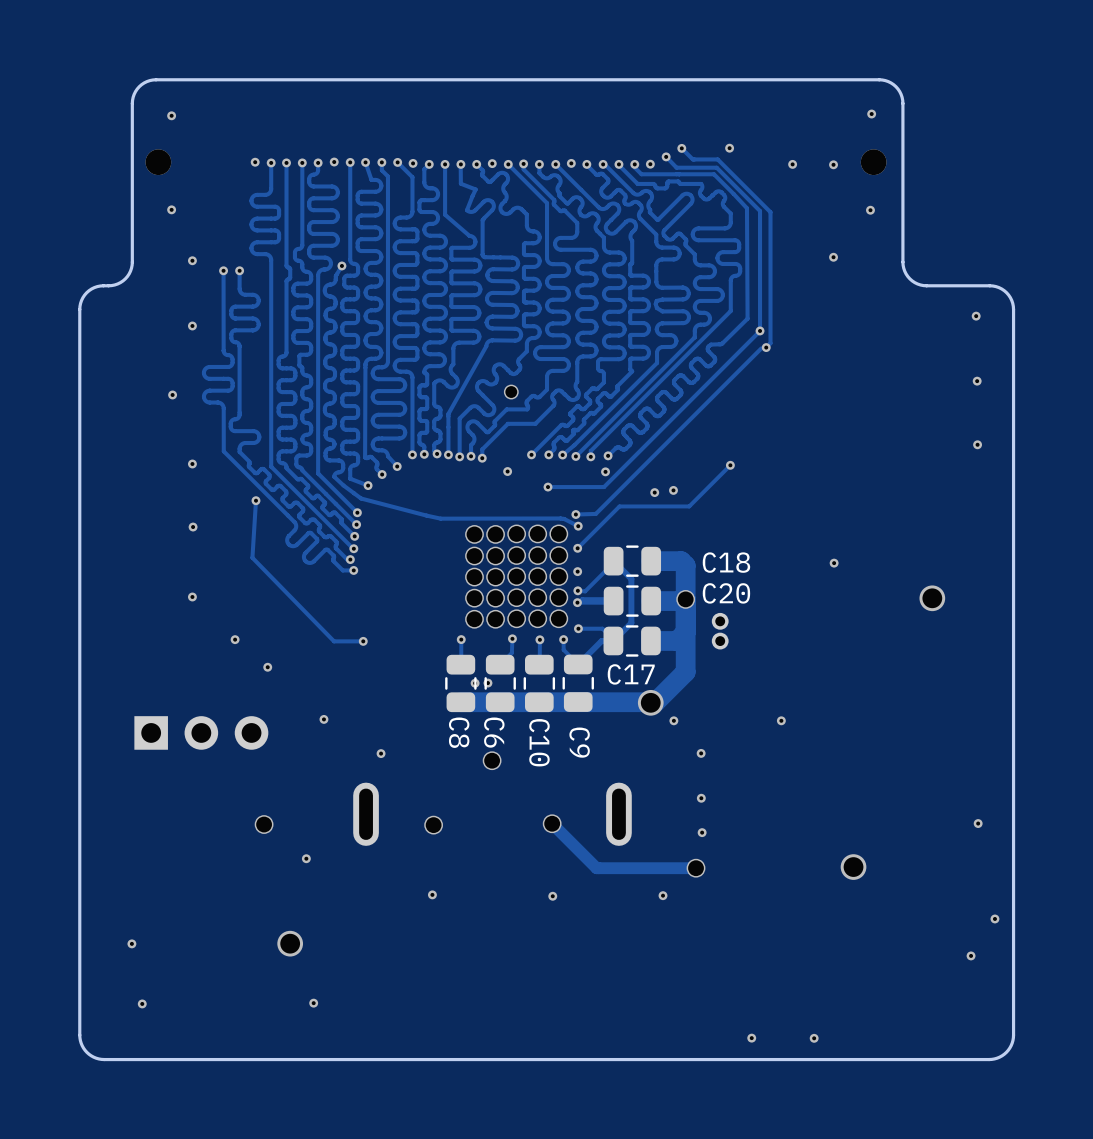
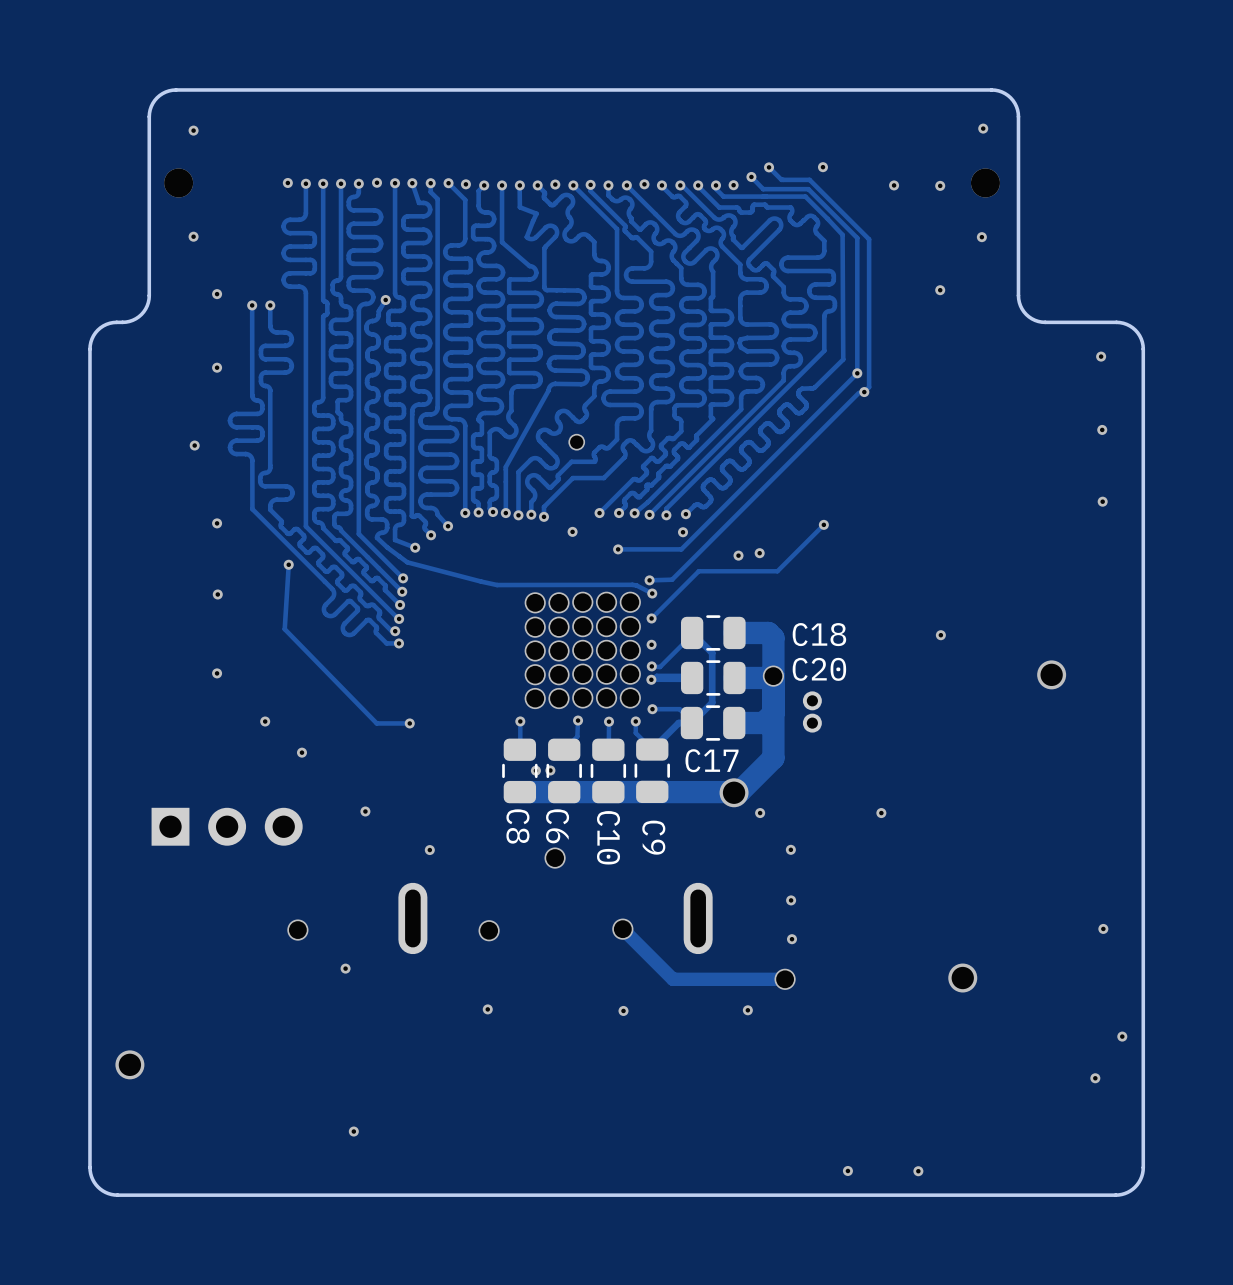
via size: [127, 939, 137, 949] -> [115, 1050, 145, 1080]
via: (290, 943) -> none
via: (142, 1003) -> none

